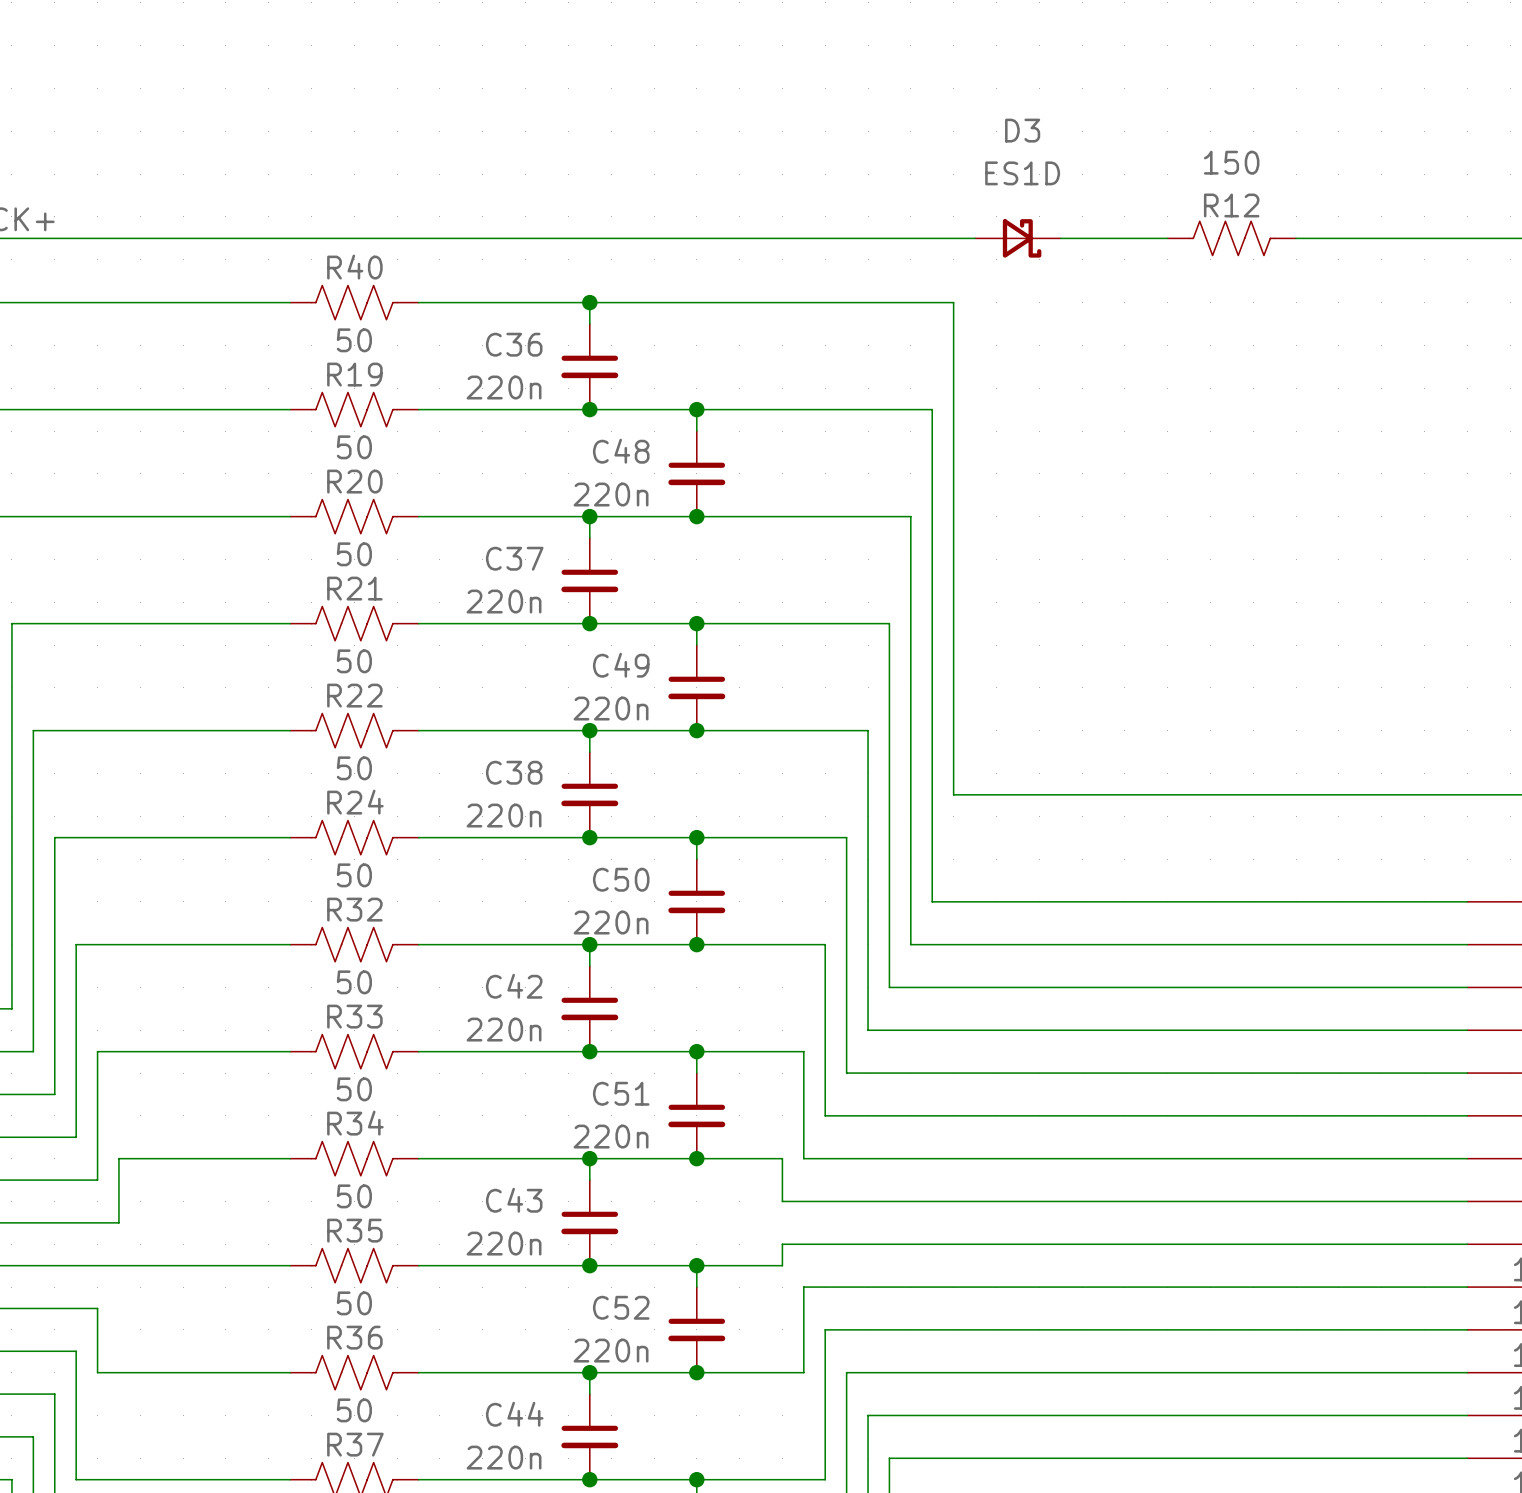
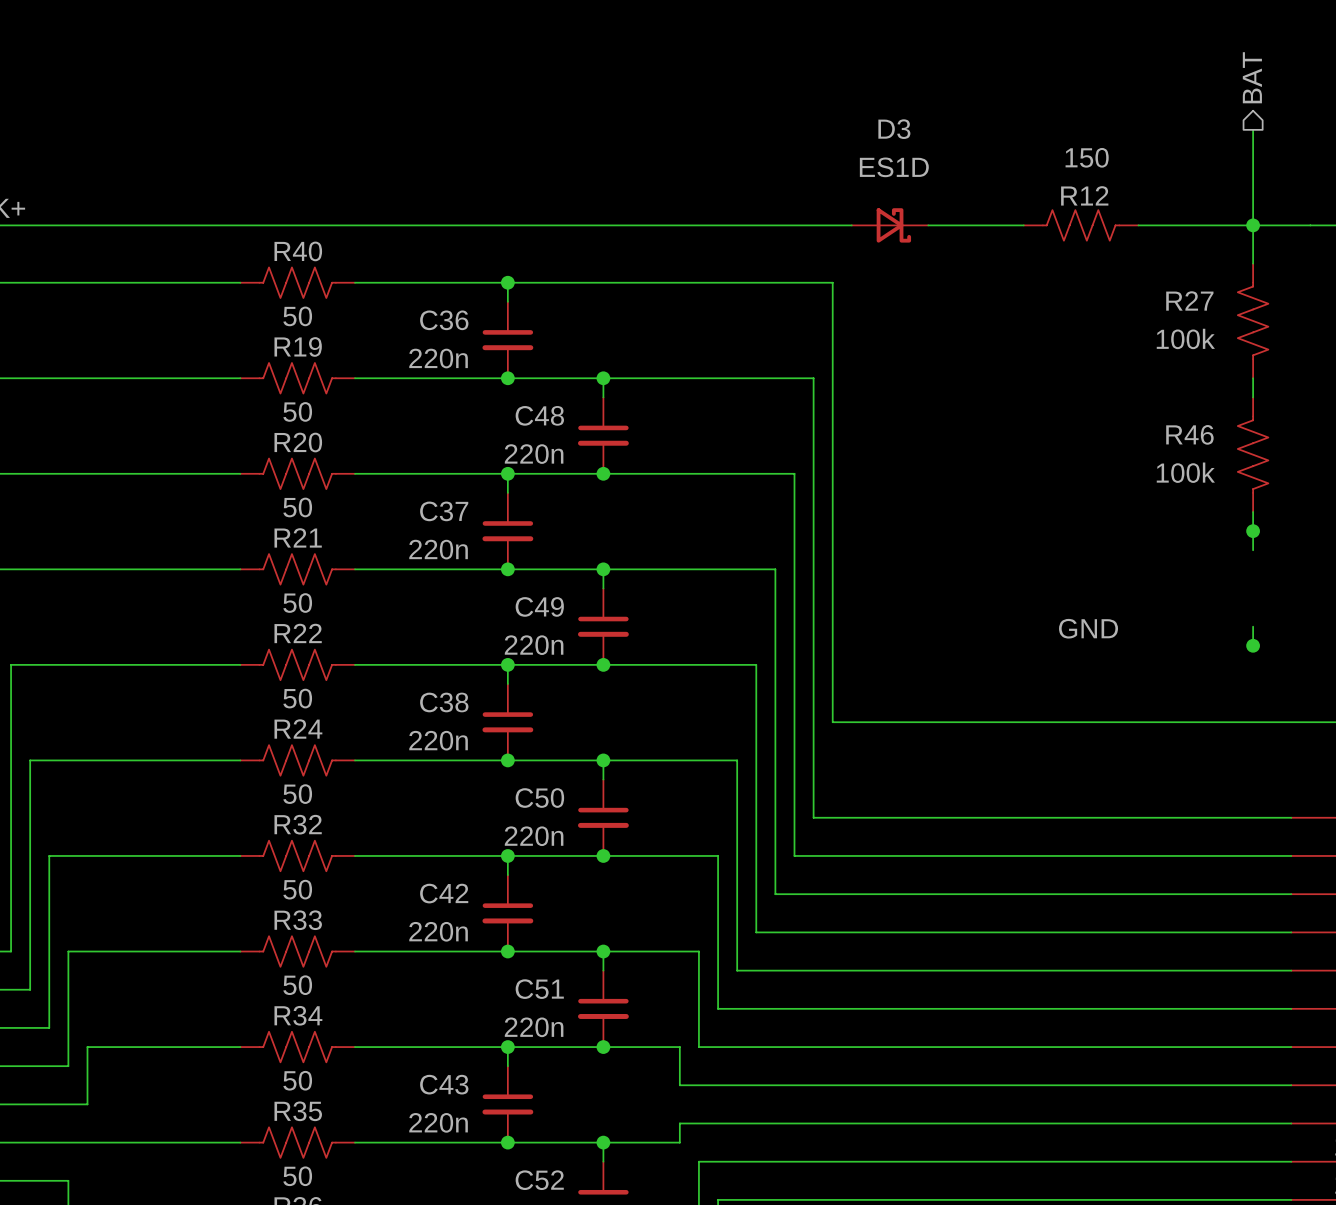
hierarchical label: none -> BAT (1252, 77)
wire: none -> (1253, 129) (1253, 263)
junction: none -> (1253, 225)
R27: none -> 100k (1253, 320)
wire: none -> (1253, 378) (1253, 397)
R46: none -> 100k (1253, 454)
wire: none -> (1253, 512) (1253, 550)
junction: none -> (1253, 531)
wire: none -> (1253, 626) (1253, 645)
label: none -> GND (1088, 628)
junction: none -> (1253, 645)

